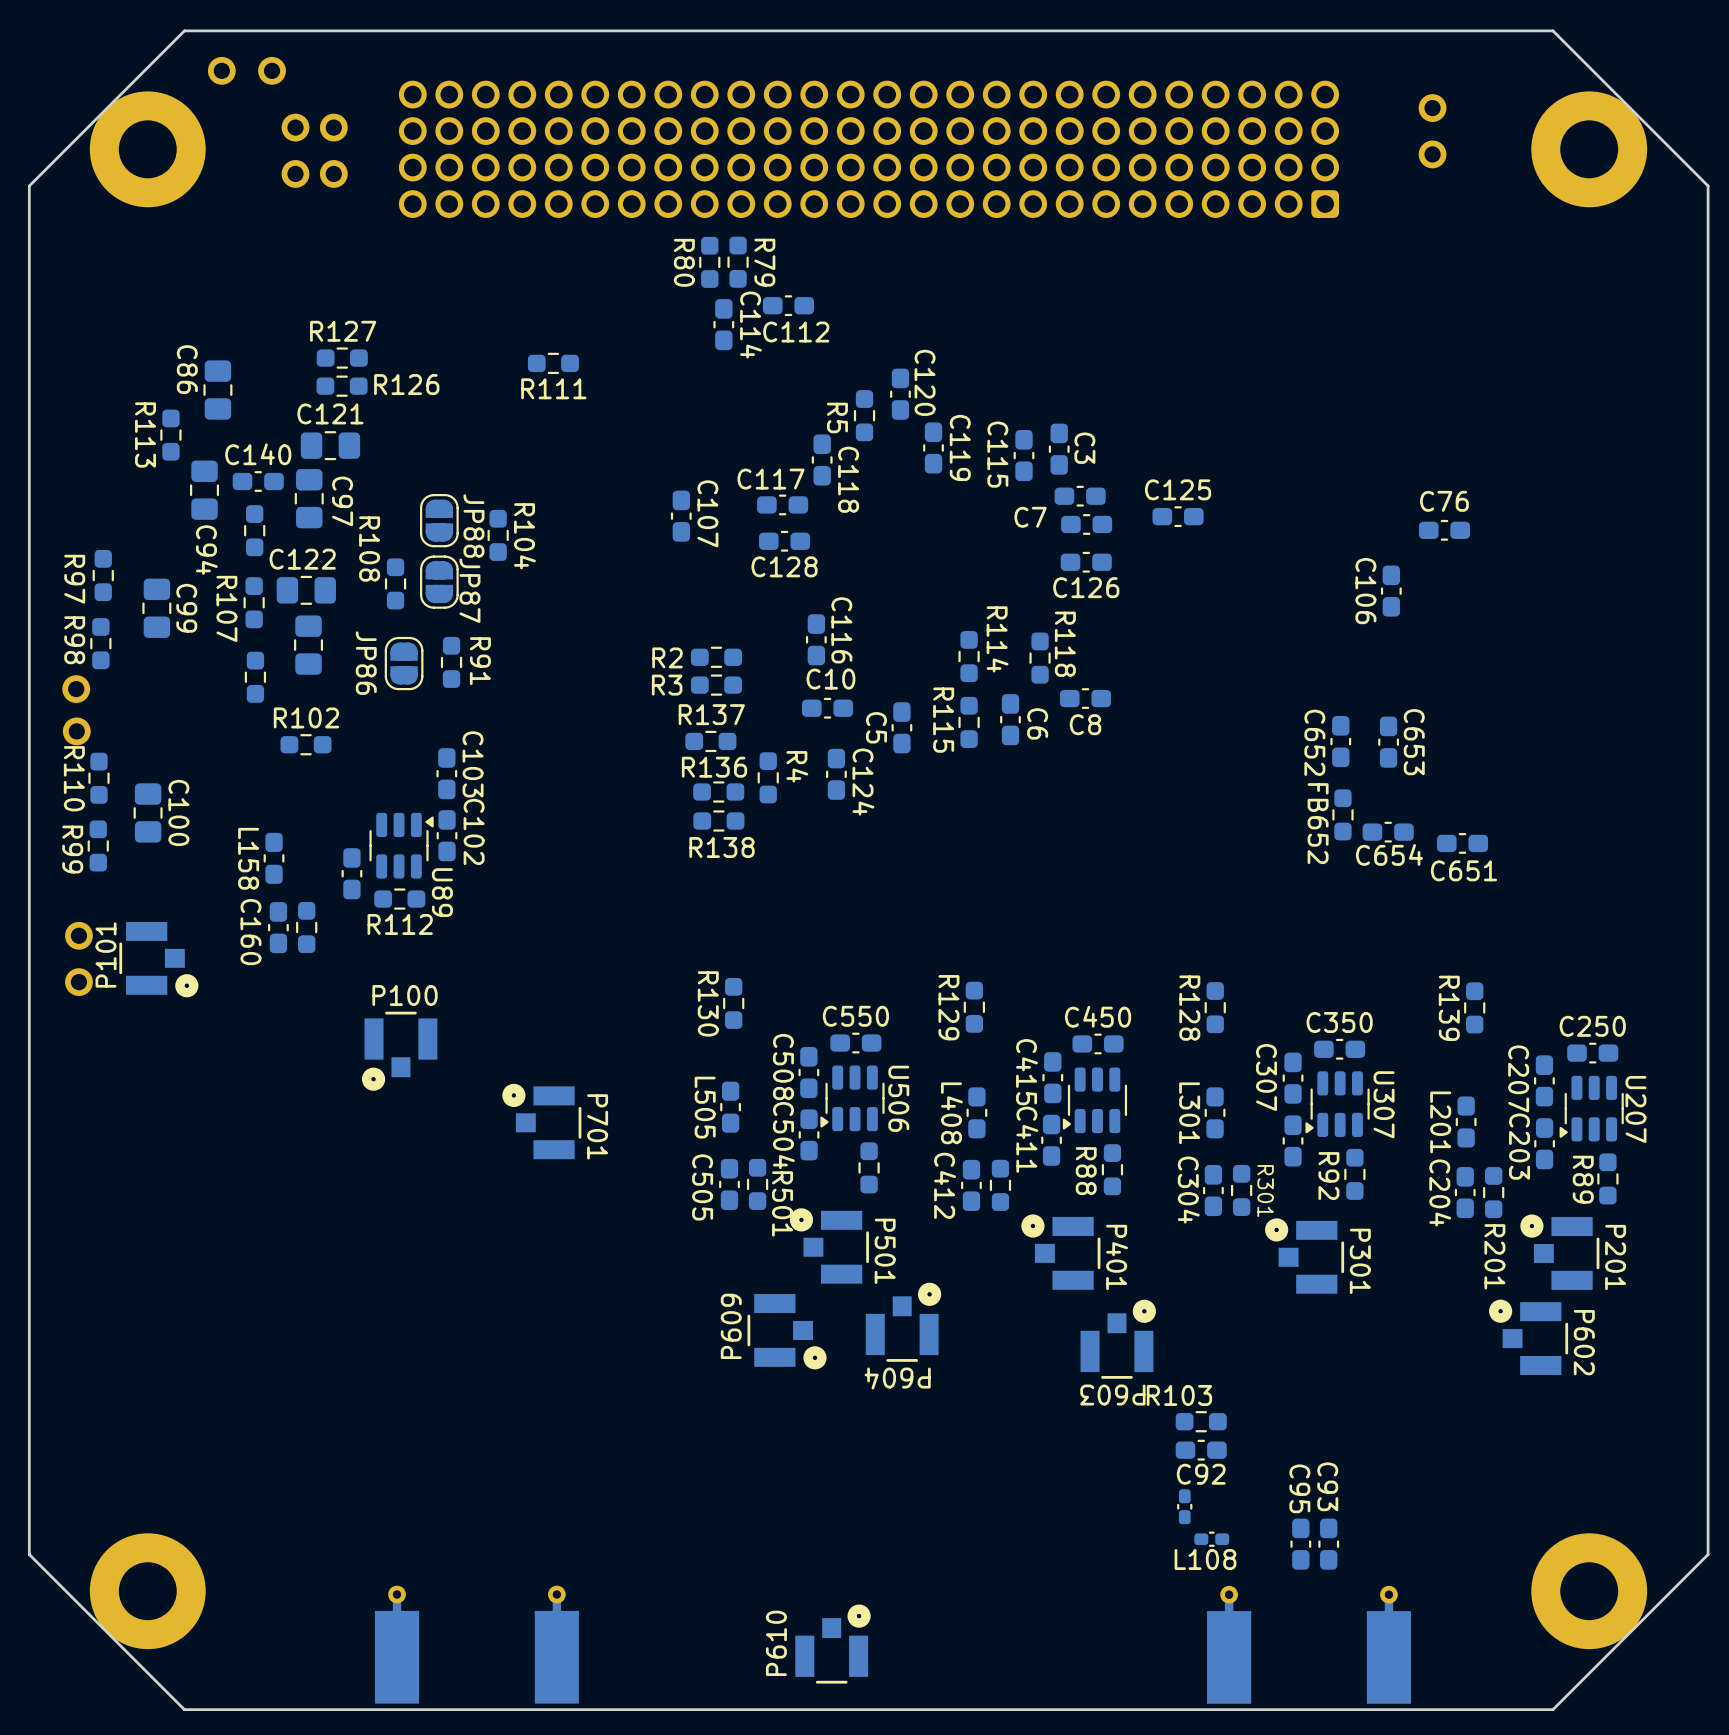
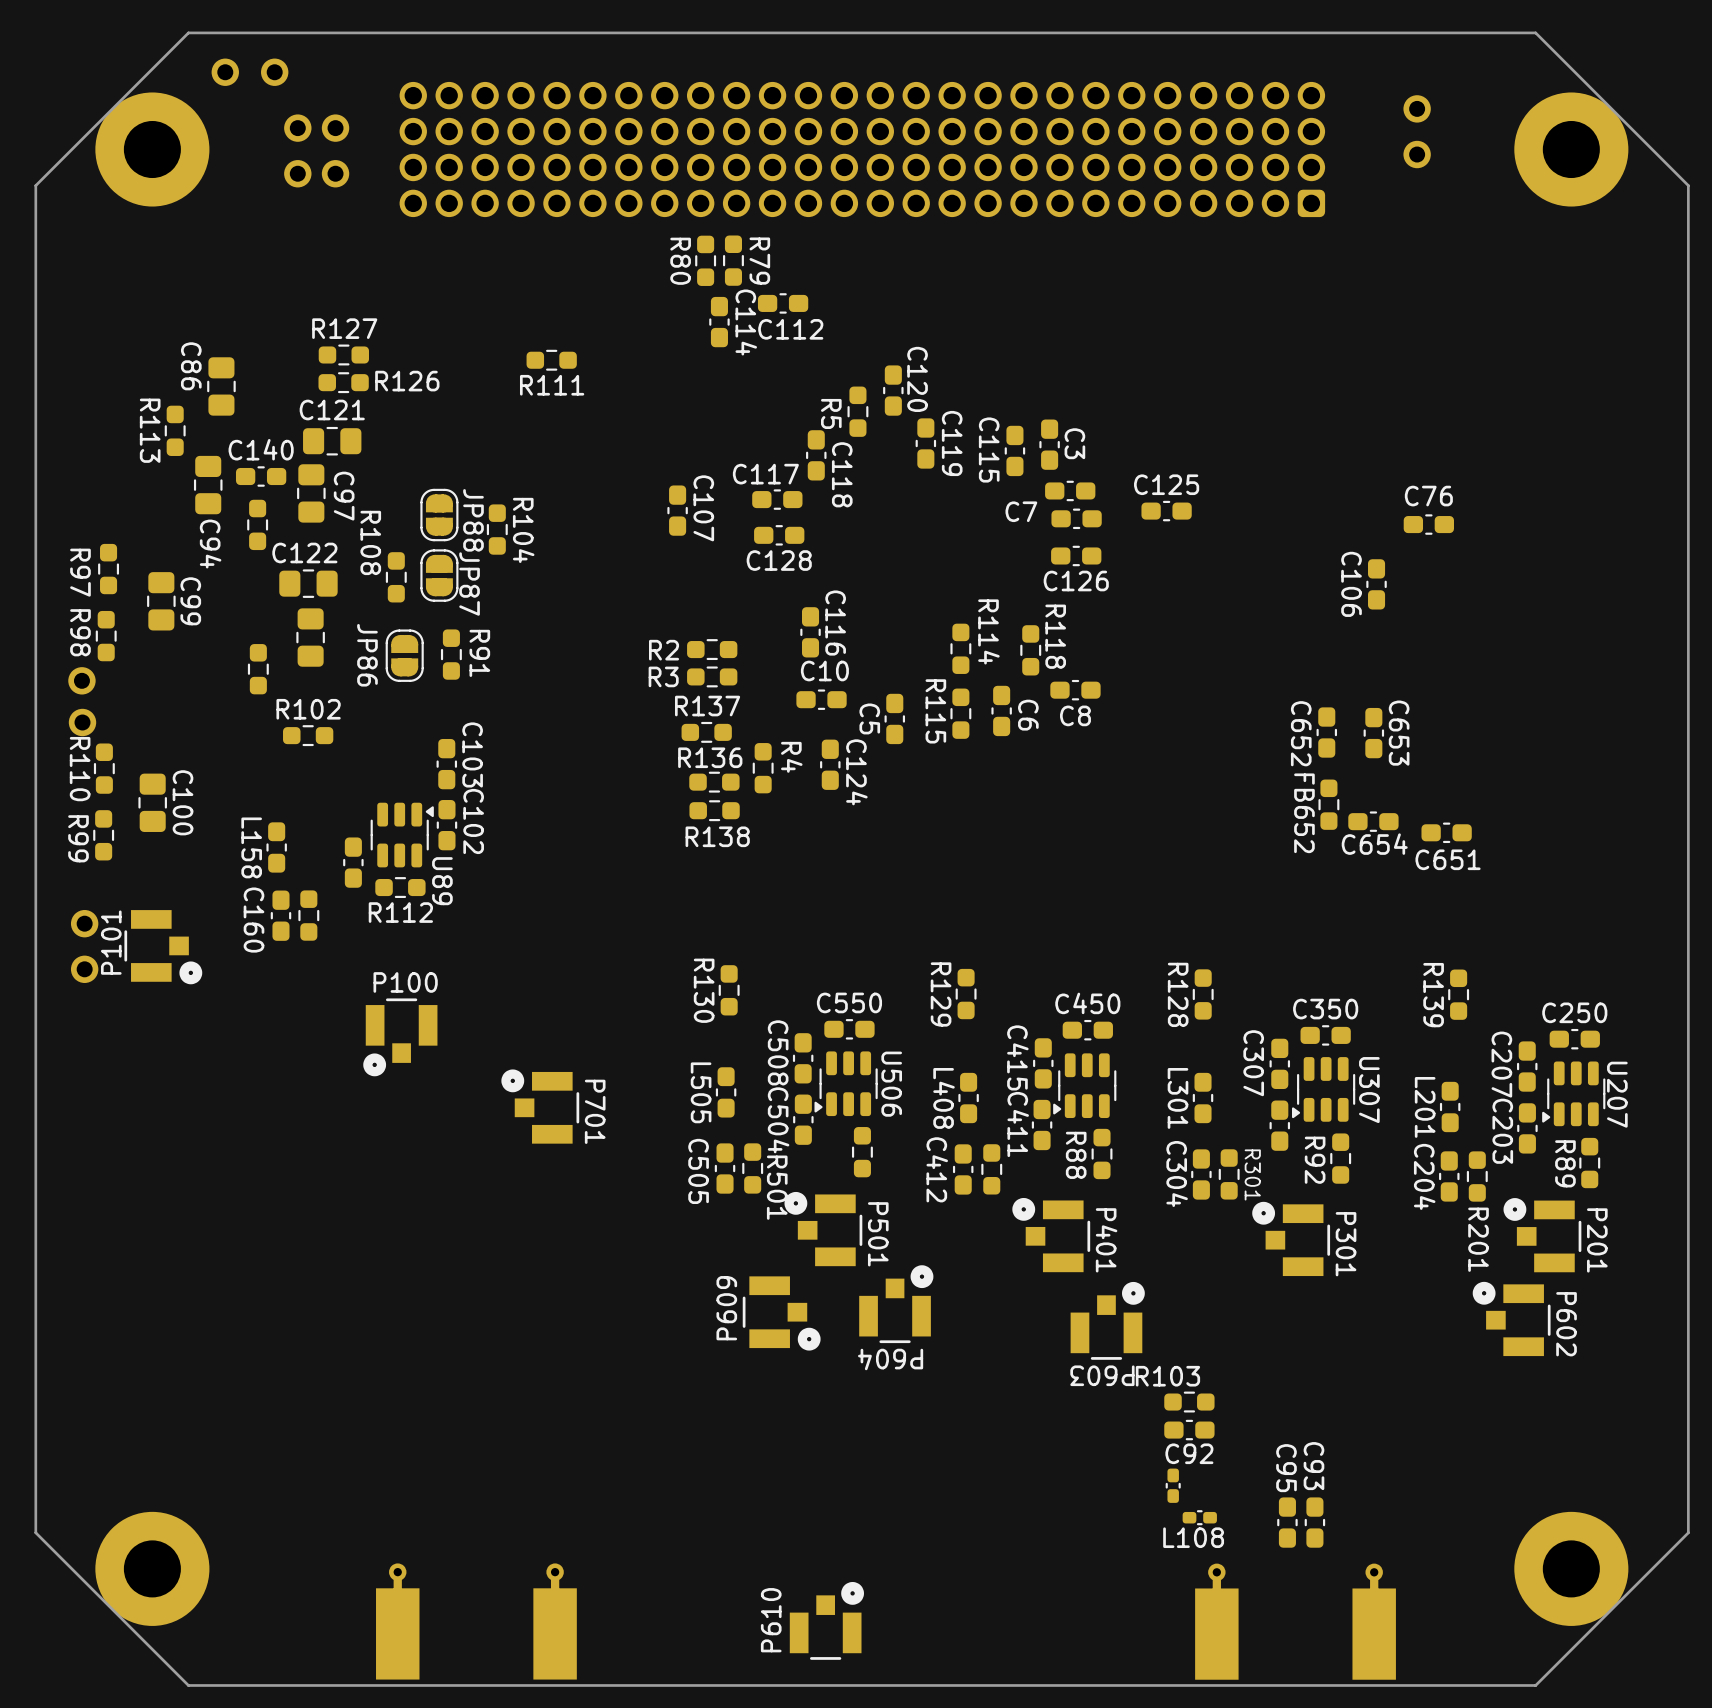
R107: (254, 602) -> none

